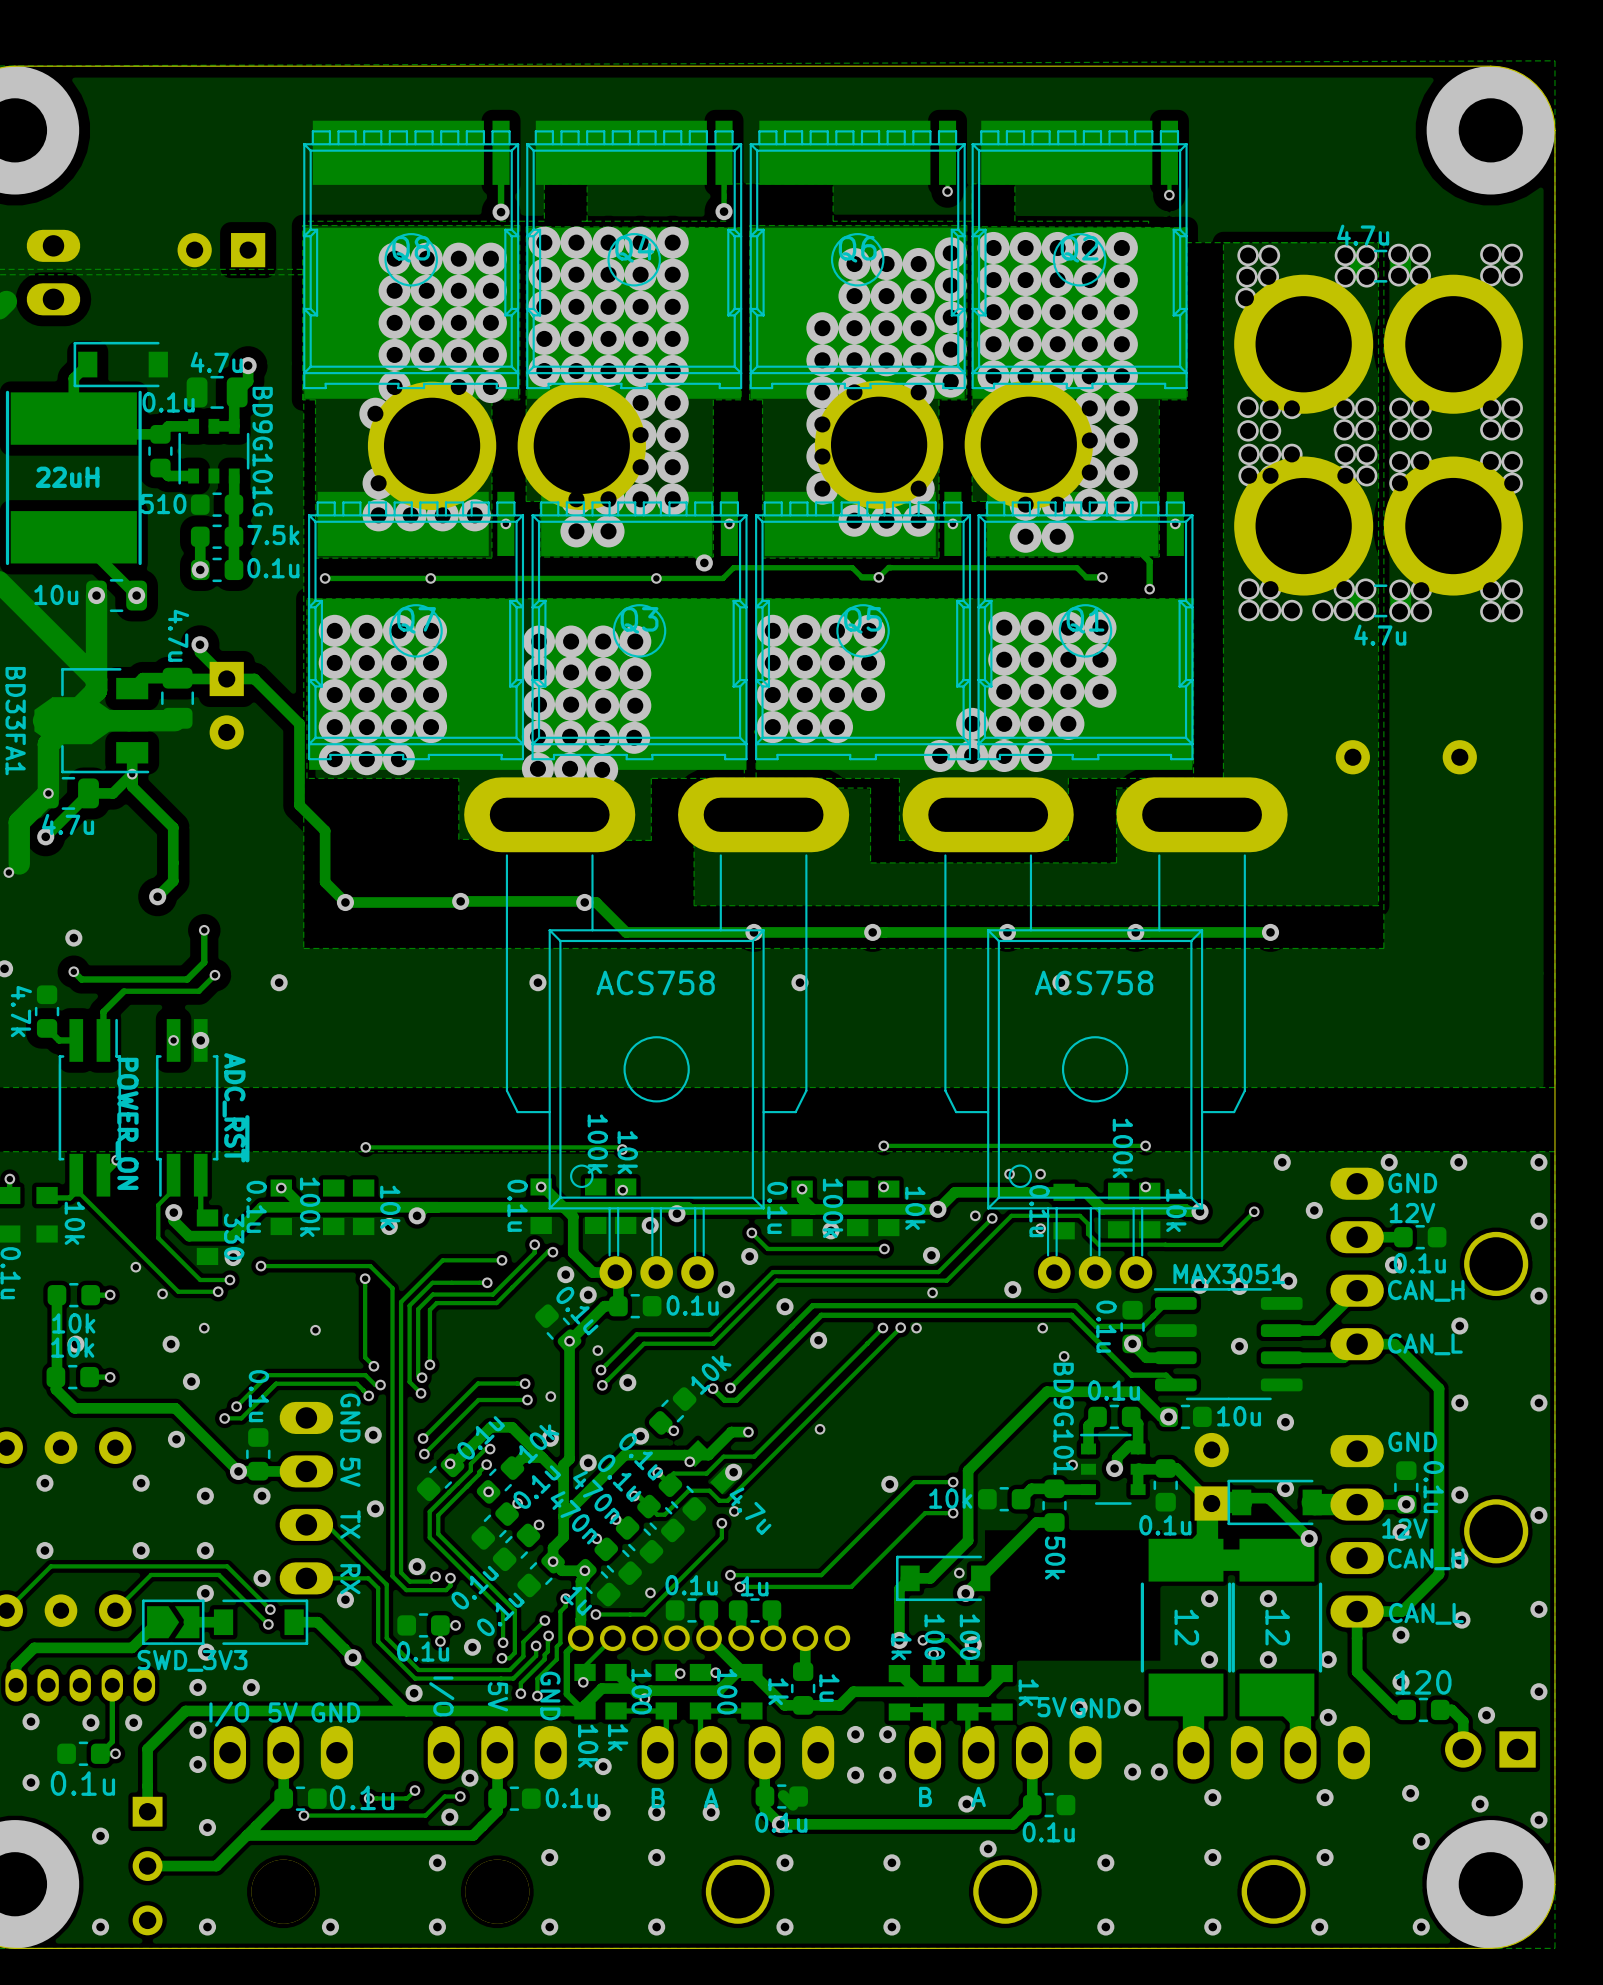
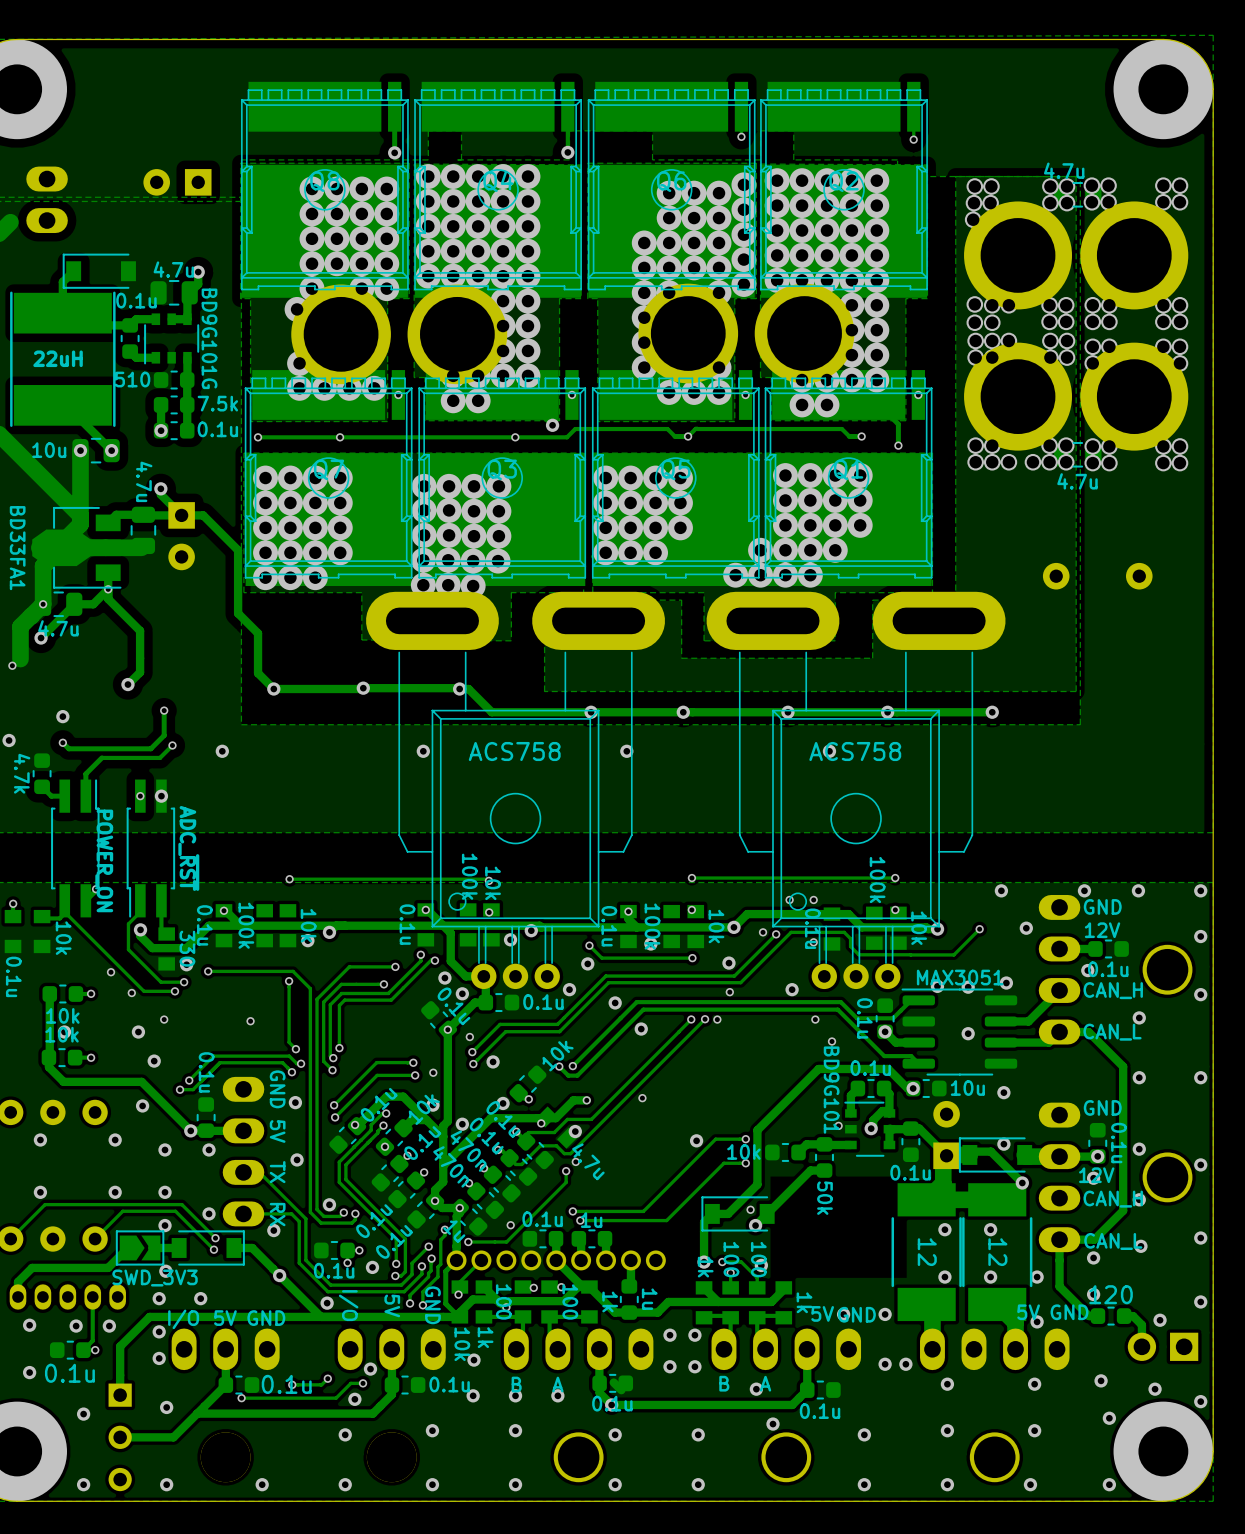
text: none -> 5V (1028, 1312)
text: none -> GND (1069, 1312)

